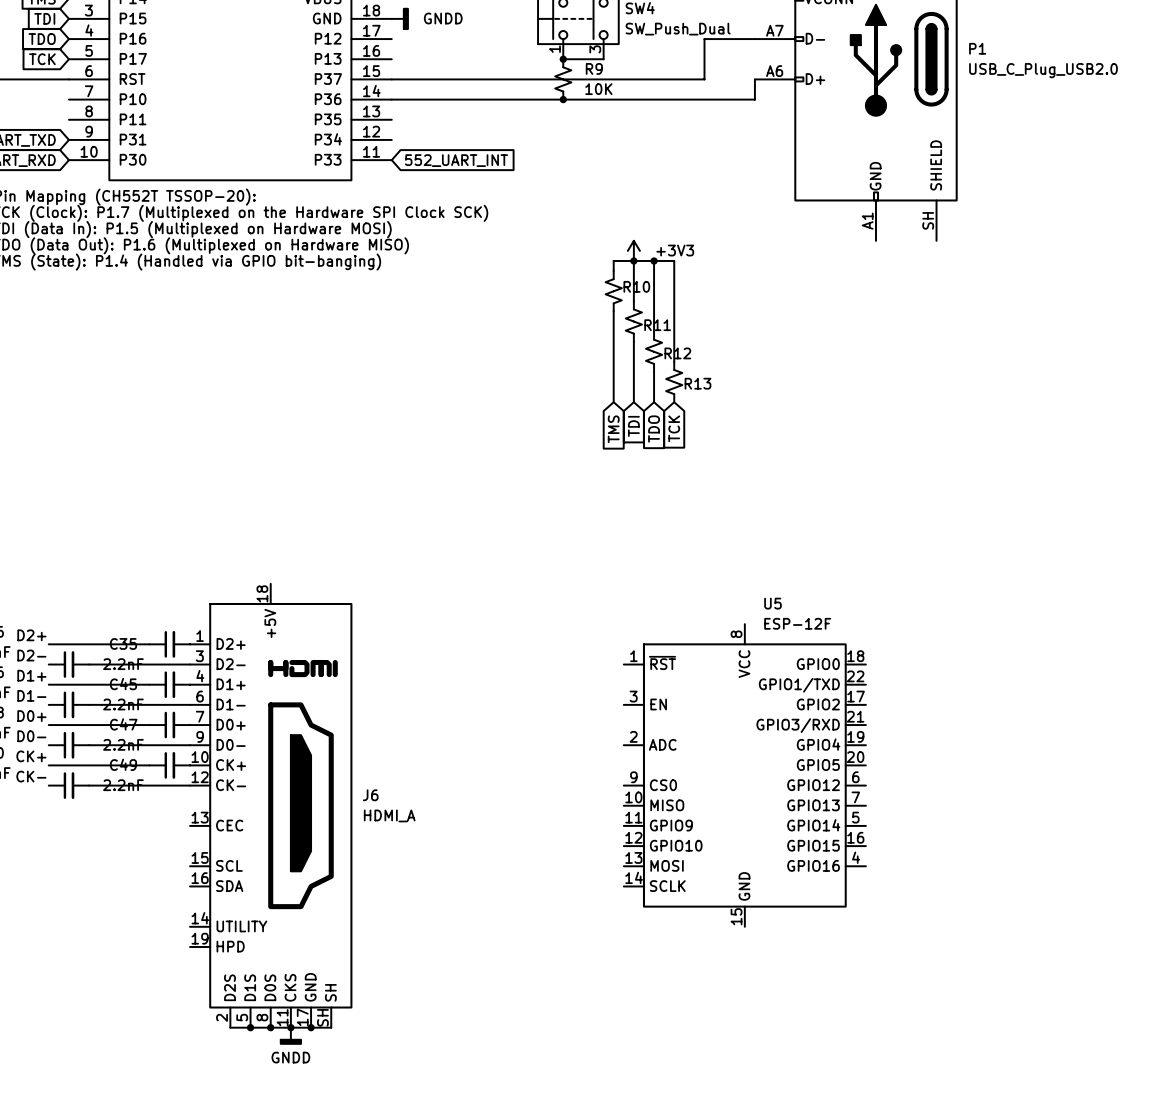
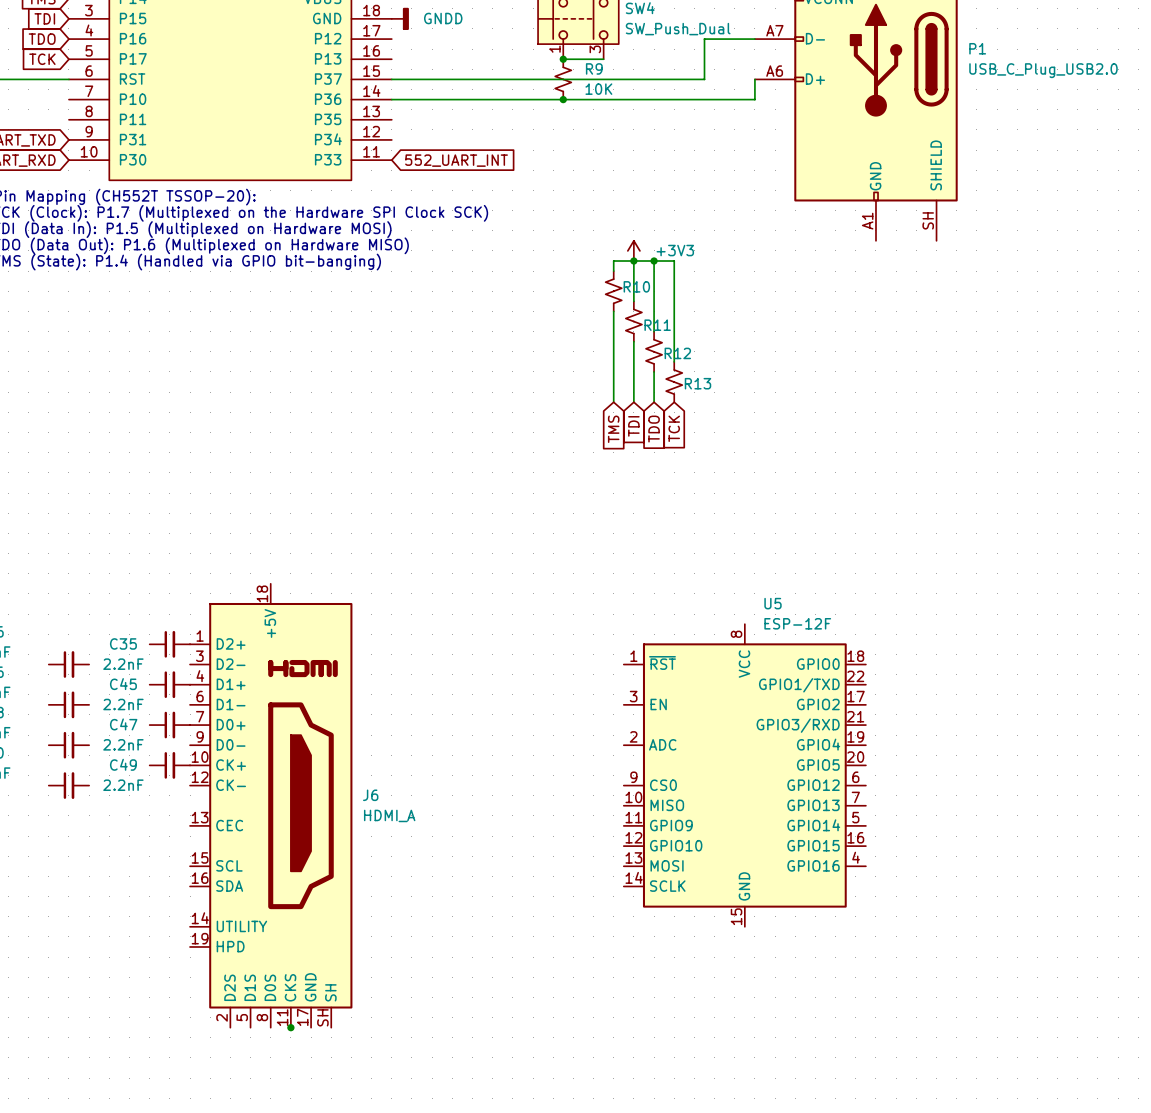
label: D2+ (31, 635) -> none
wire: (48, 644) (149, 644) -> none
label: D2- (31, 655) -> none
wire: (89, 664) (190, 664) -> none
label: D1+ (31, 675) -> none
wire: (48, 684) (149, 684) -> none
label: D1- (31, 695) -> none
wire: (89, 704) (190, 704) -> none
label: D0+ (31, 716) -> none
wire: (48, 725) (149, 725) -> none
label: D0- (31, 736) -> none
wire: (89, 745) (190, 745) -> none
label: CK+ (31, 756) -> none
wire: (48, 765) (149, 765) -> none
label: CK- (31, 776) -> none
wire: (89, 785) (190, 785) -> none
wire: (230, 1027) (331, 1027) -> none
junction: (250, 1027) -> none
junction: (270, 1027) -> none
junction: (311, 1027) -> none
power symbol: GNDD (290, 1036) -> none

